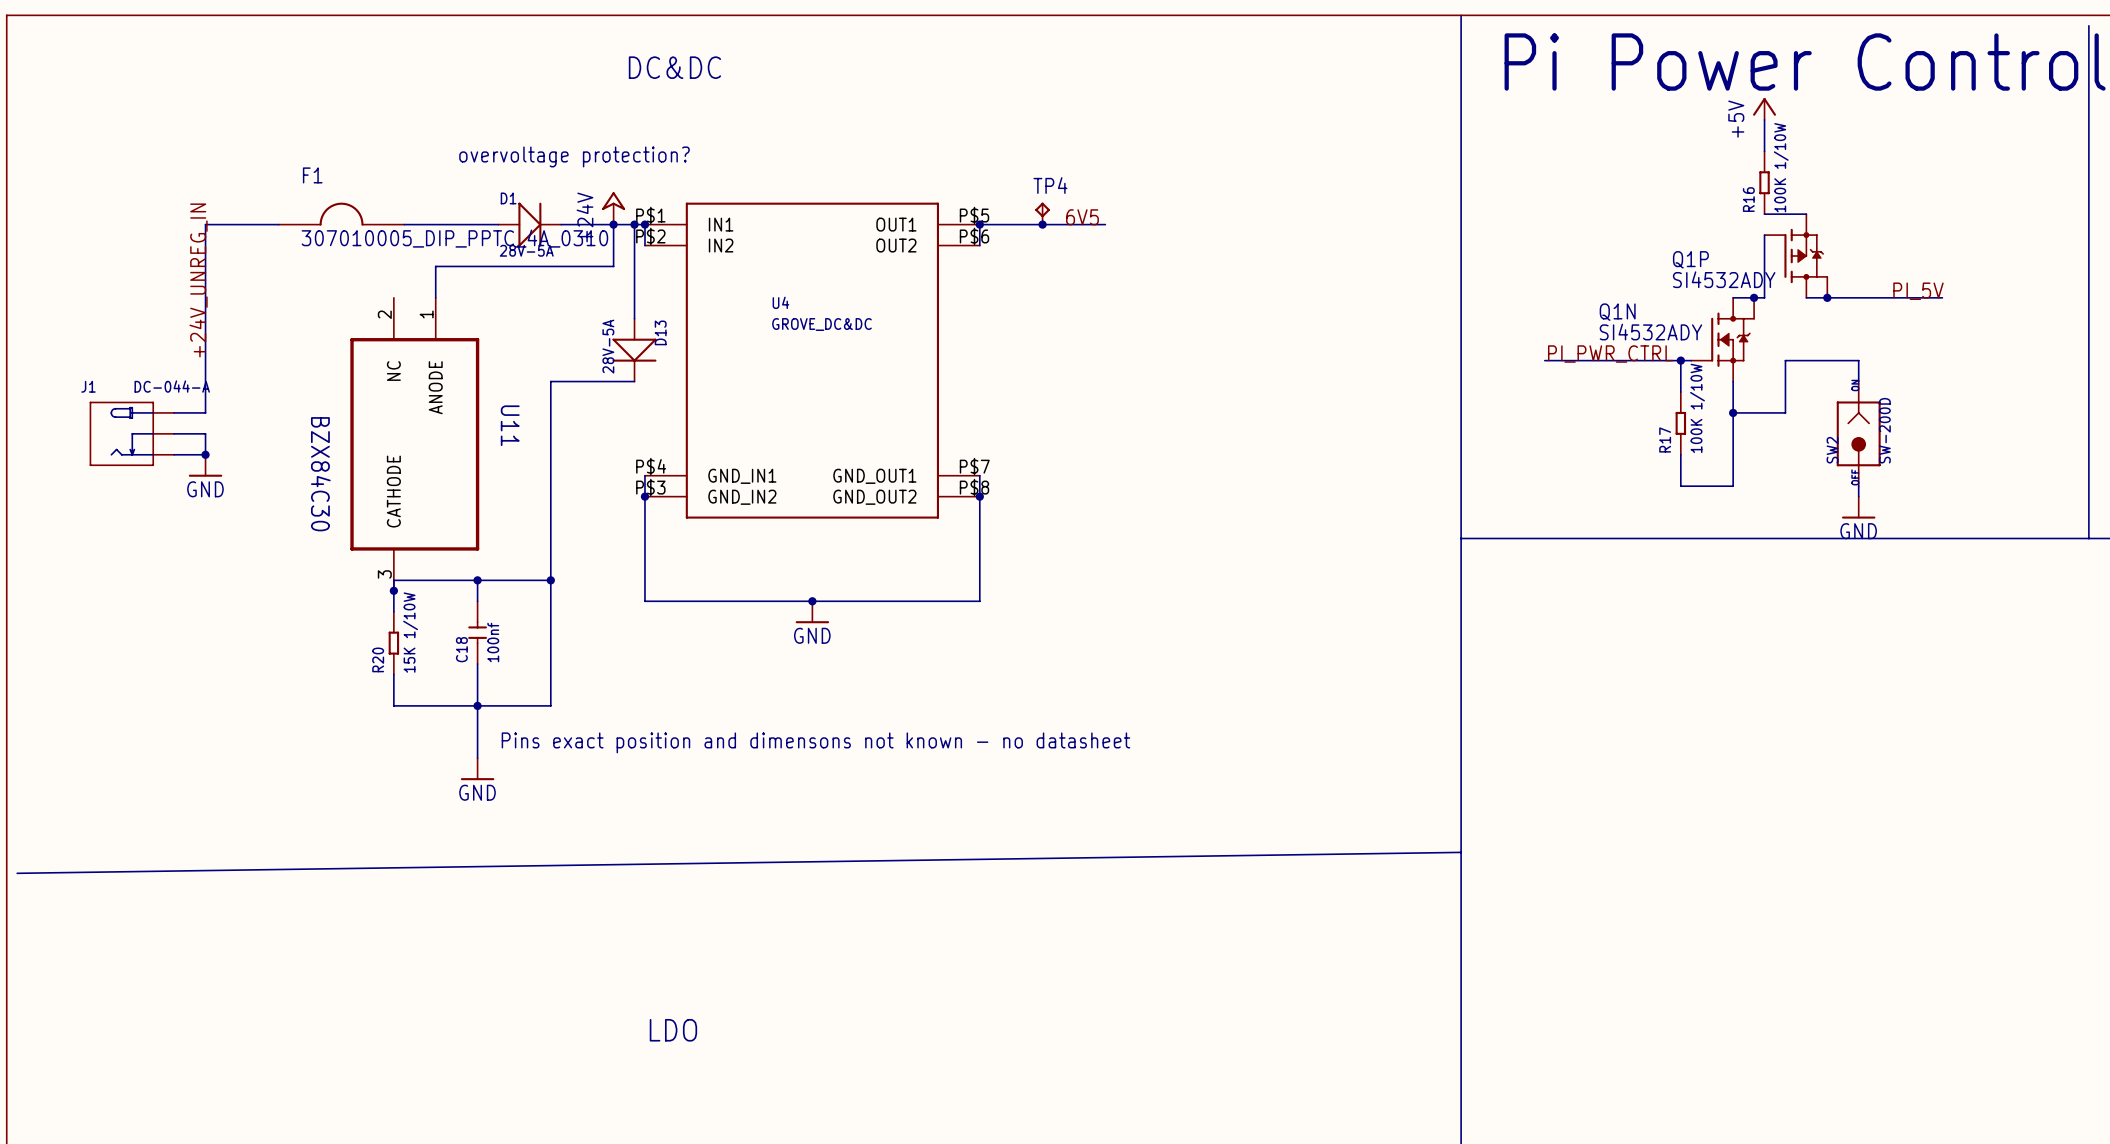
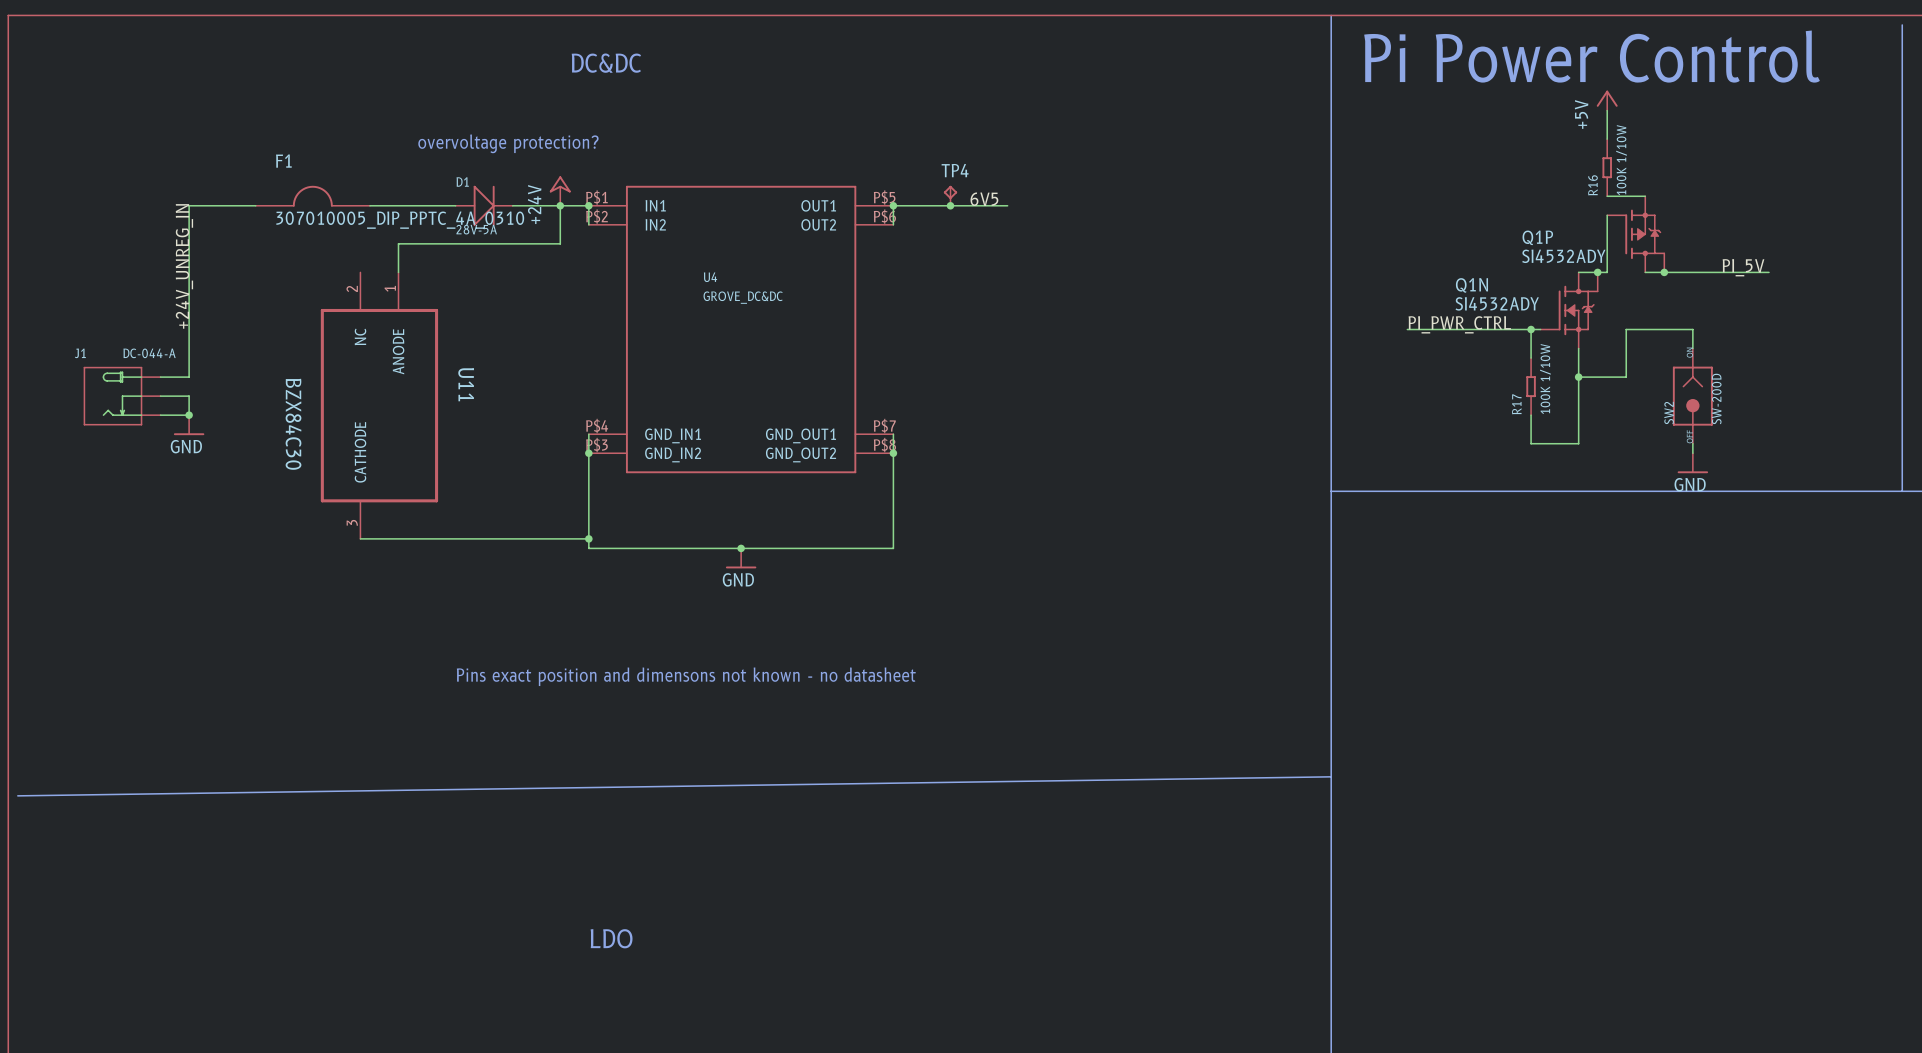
wire: (634, 224) (634, 318) -> none
junction: (634, 224) -> none
D13: 28V-5A (634, 350) -> none
wire: (634, 381) (550, 381) (550, 705) (393, 705) (393, 674) -> none
wire: (477, 580) (477, 601) -> none
junction: (477, 580) -> none
wire: (550, 580) (393, 580) (393, 611) -> none
junction: (550, 580) -> none
wire: none -> (360, 538) (588, 538)
junction: (393, 590) -> none
junction: none -> (588, 538)
C18: 100nf (477, 632) -> none
R20: 15K 1/10W (393, 643) -> none
wire: (477, 664) (477, 758) -> none
junction: (477, 705) -> none
power symbol: GND (477, 769) -> none

